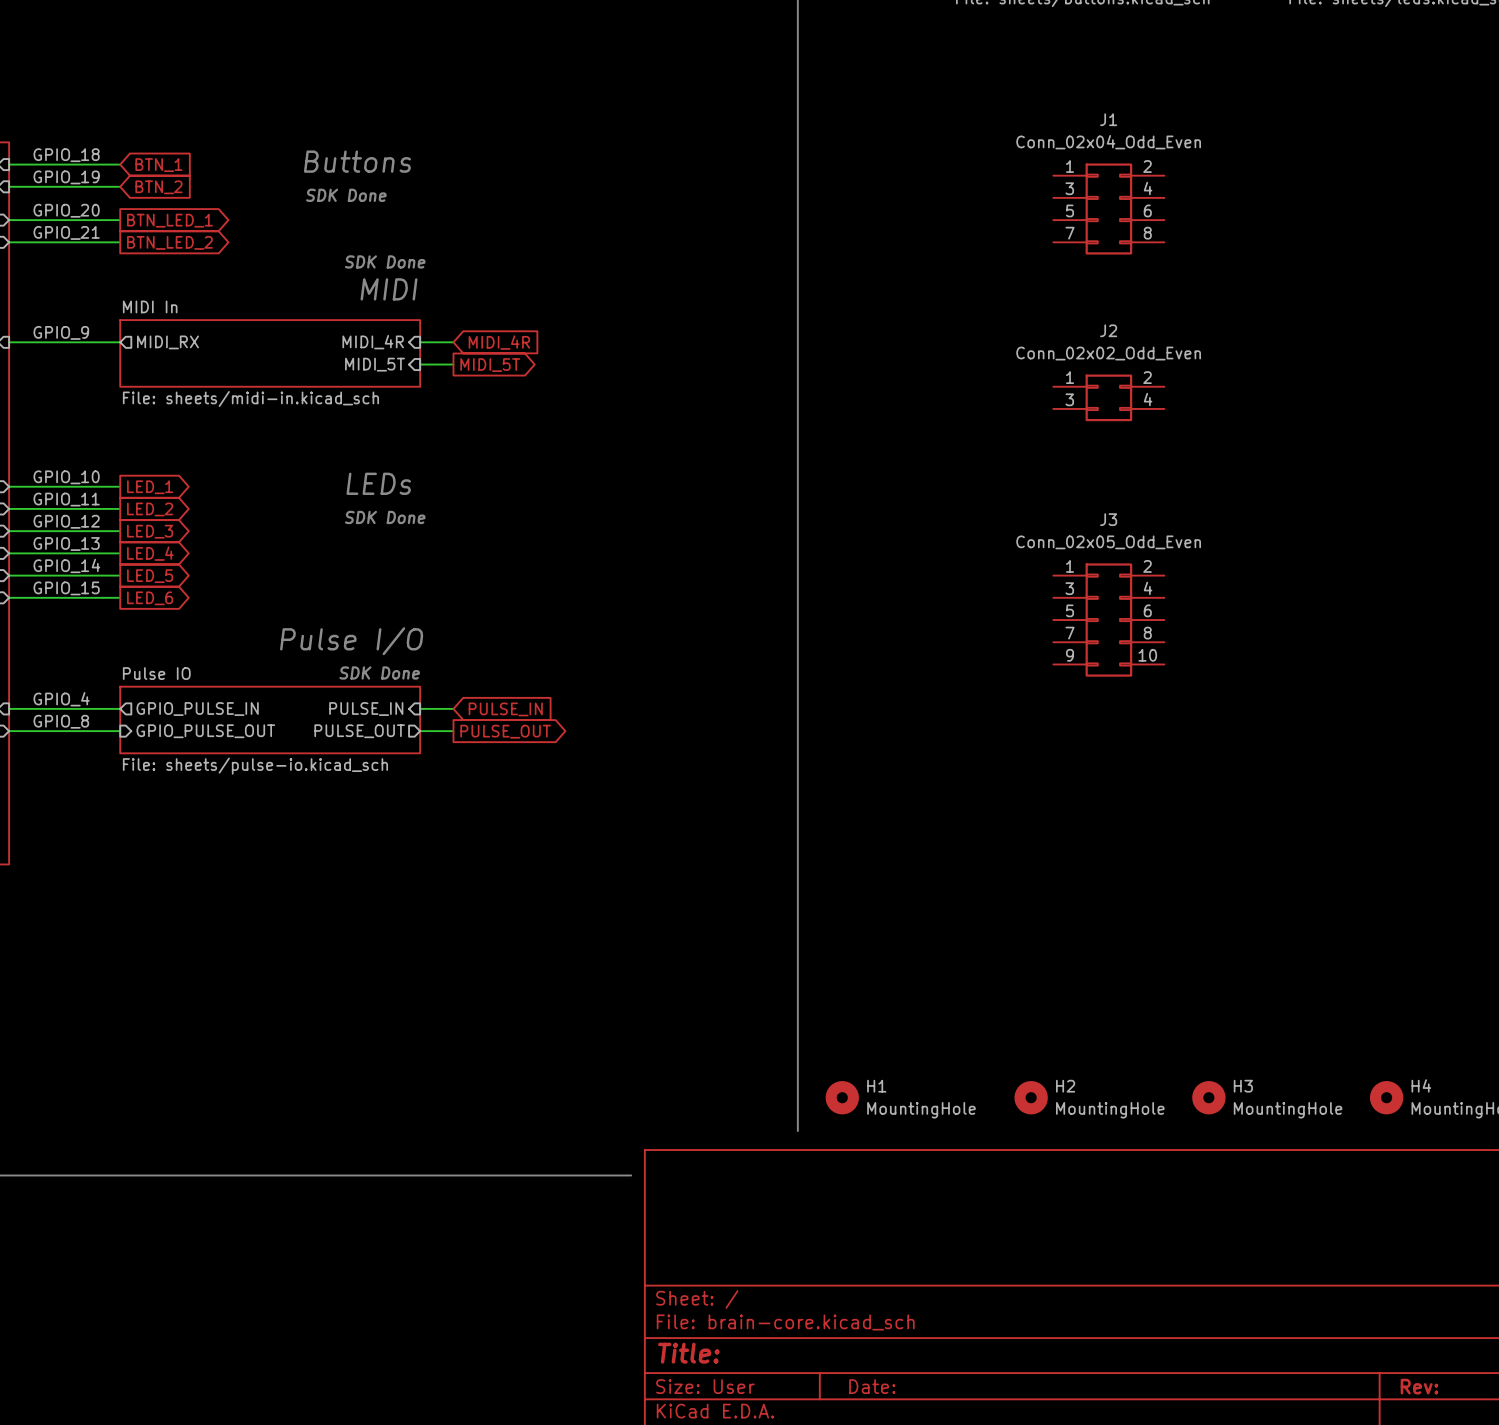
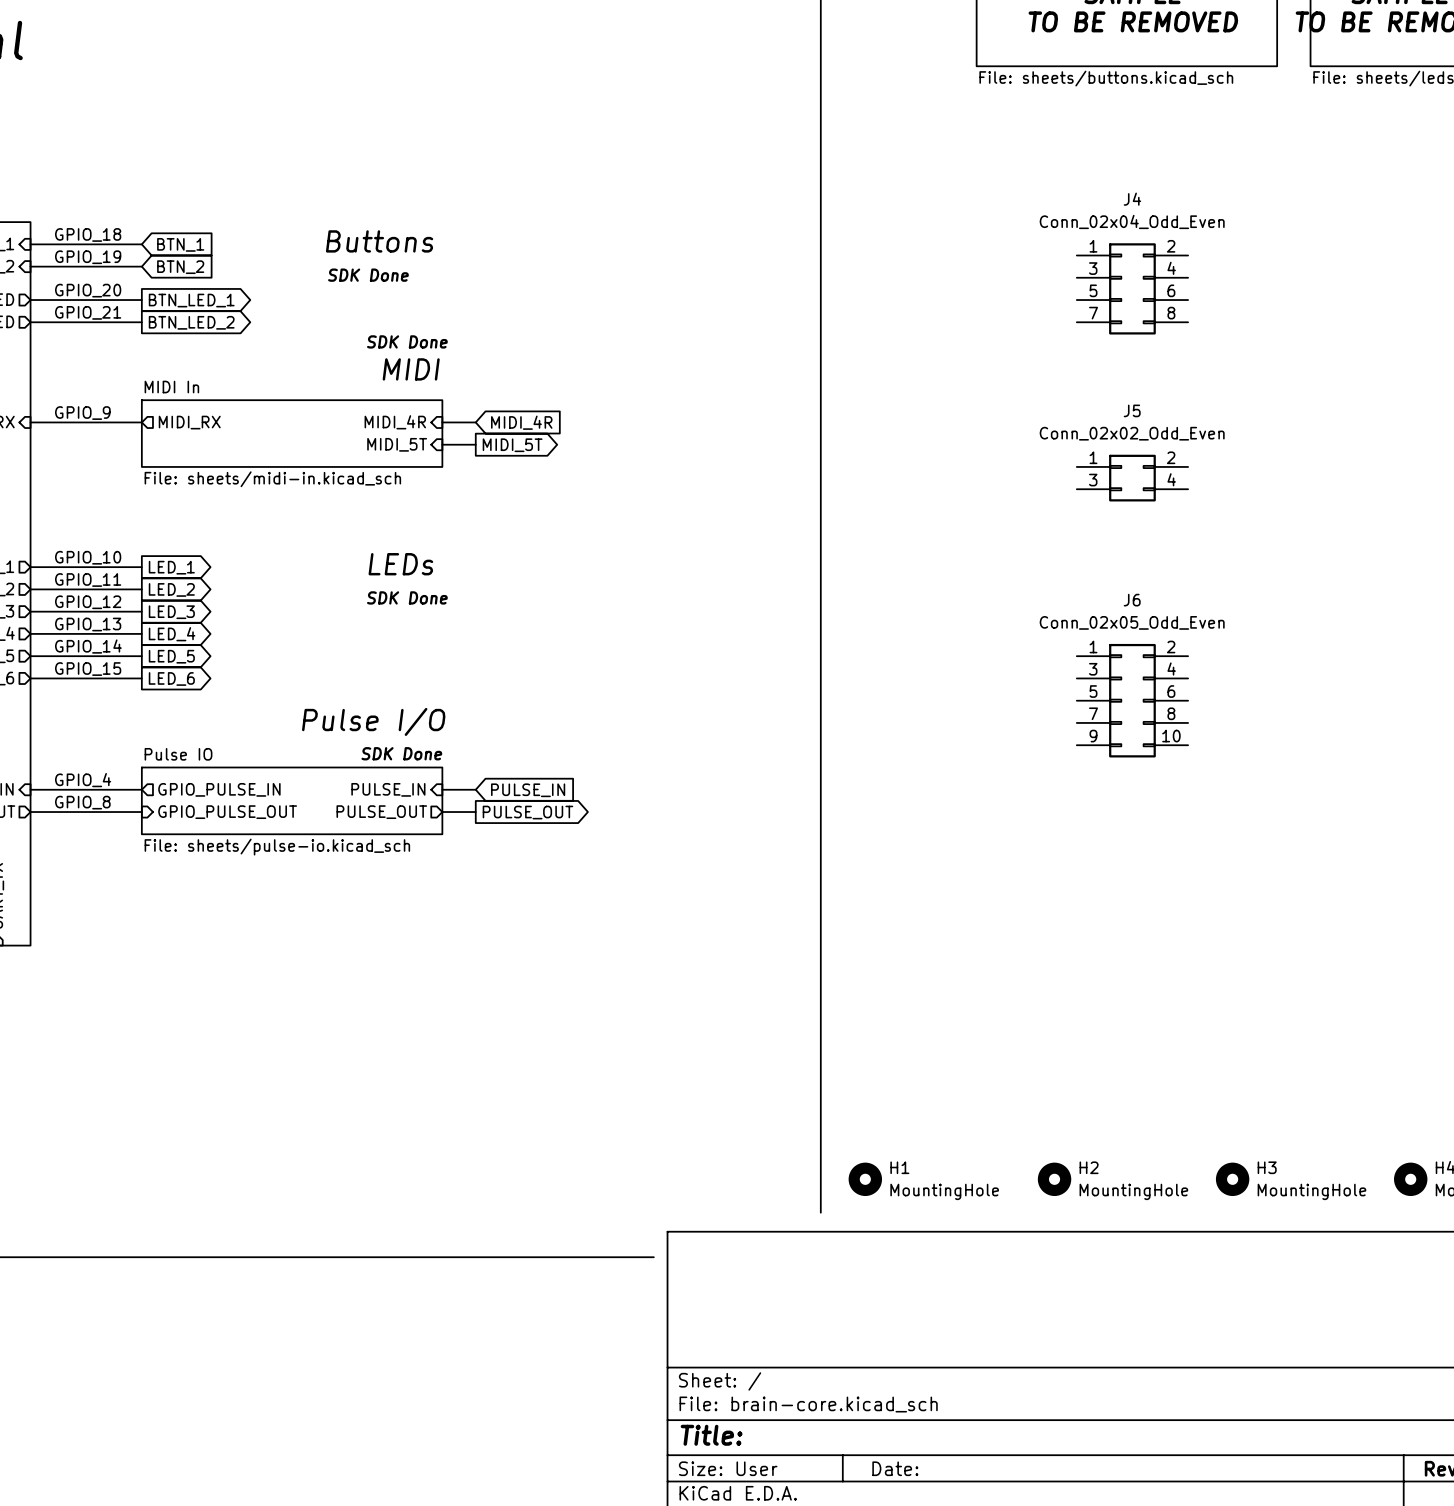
J1 name: J1 (1108, 119) -> J4 (1132, 199)
J2 name: J2 (1108, 330) -> J5 (1132, 410)
J3 name: J3 (1108, 519) -> J6 (1132, 600)

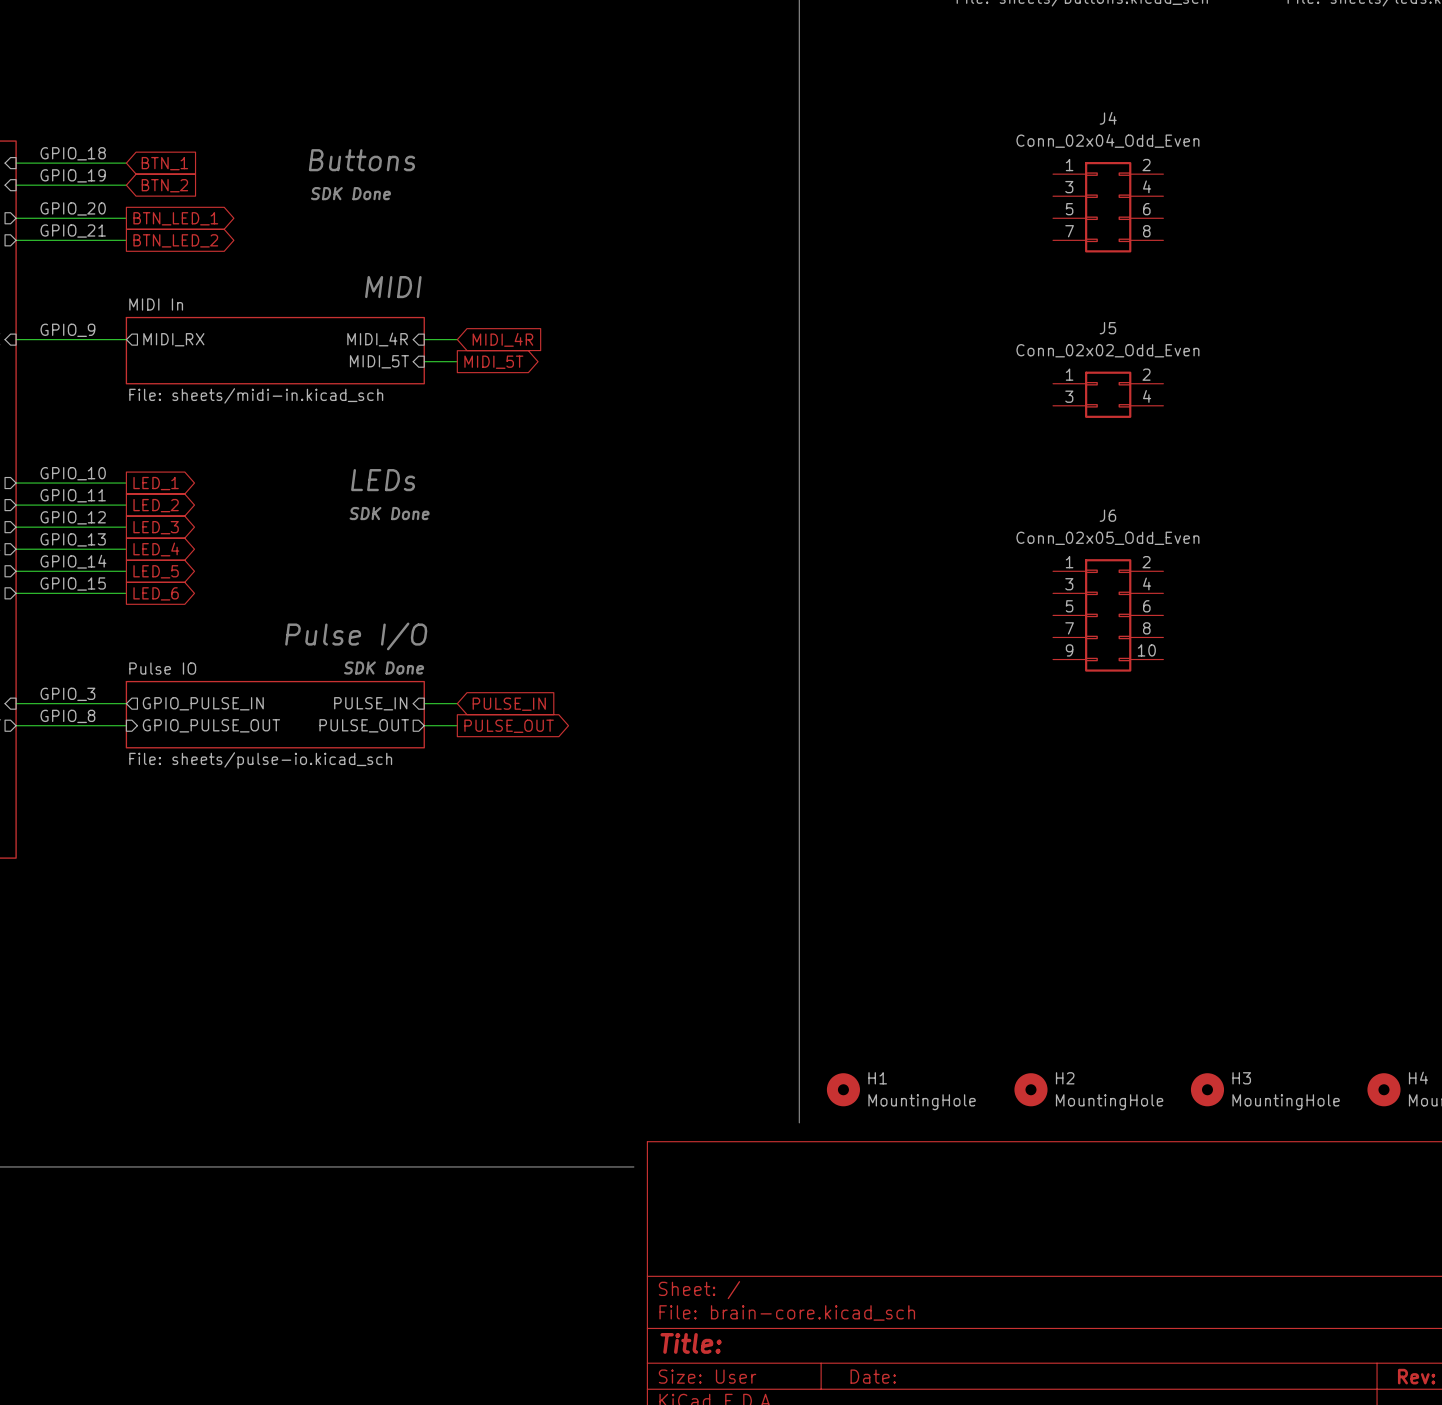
text: SDK Done (407, 341) -> none
label: GPIO_4 (83, 780) -> GPIO_3 (67, 694)

